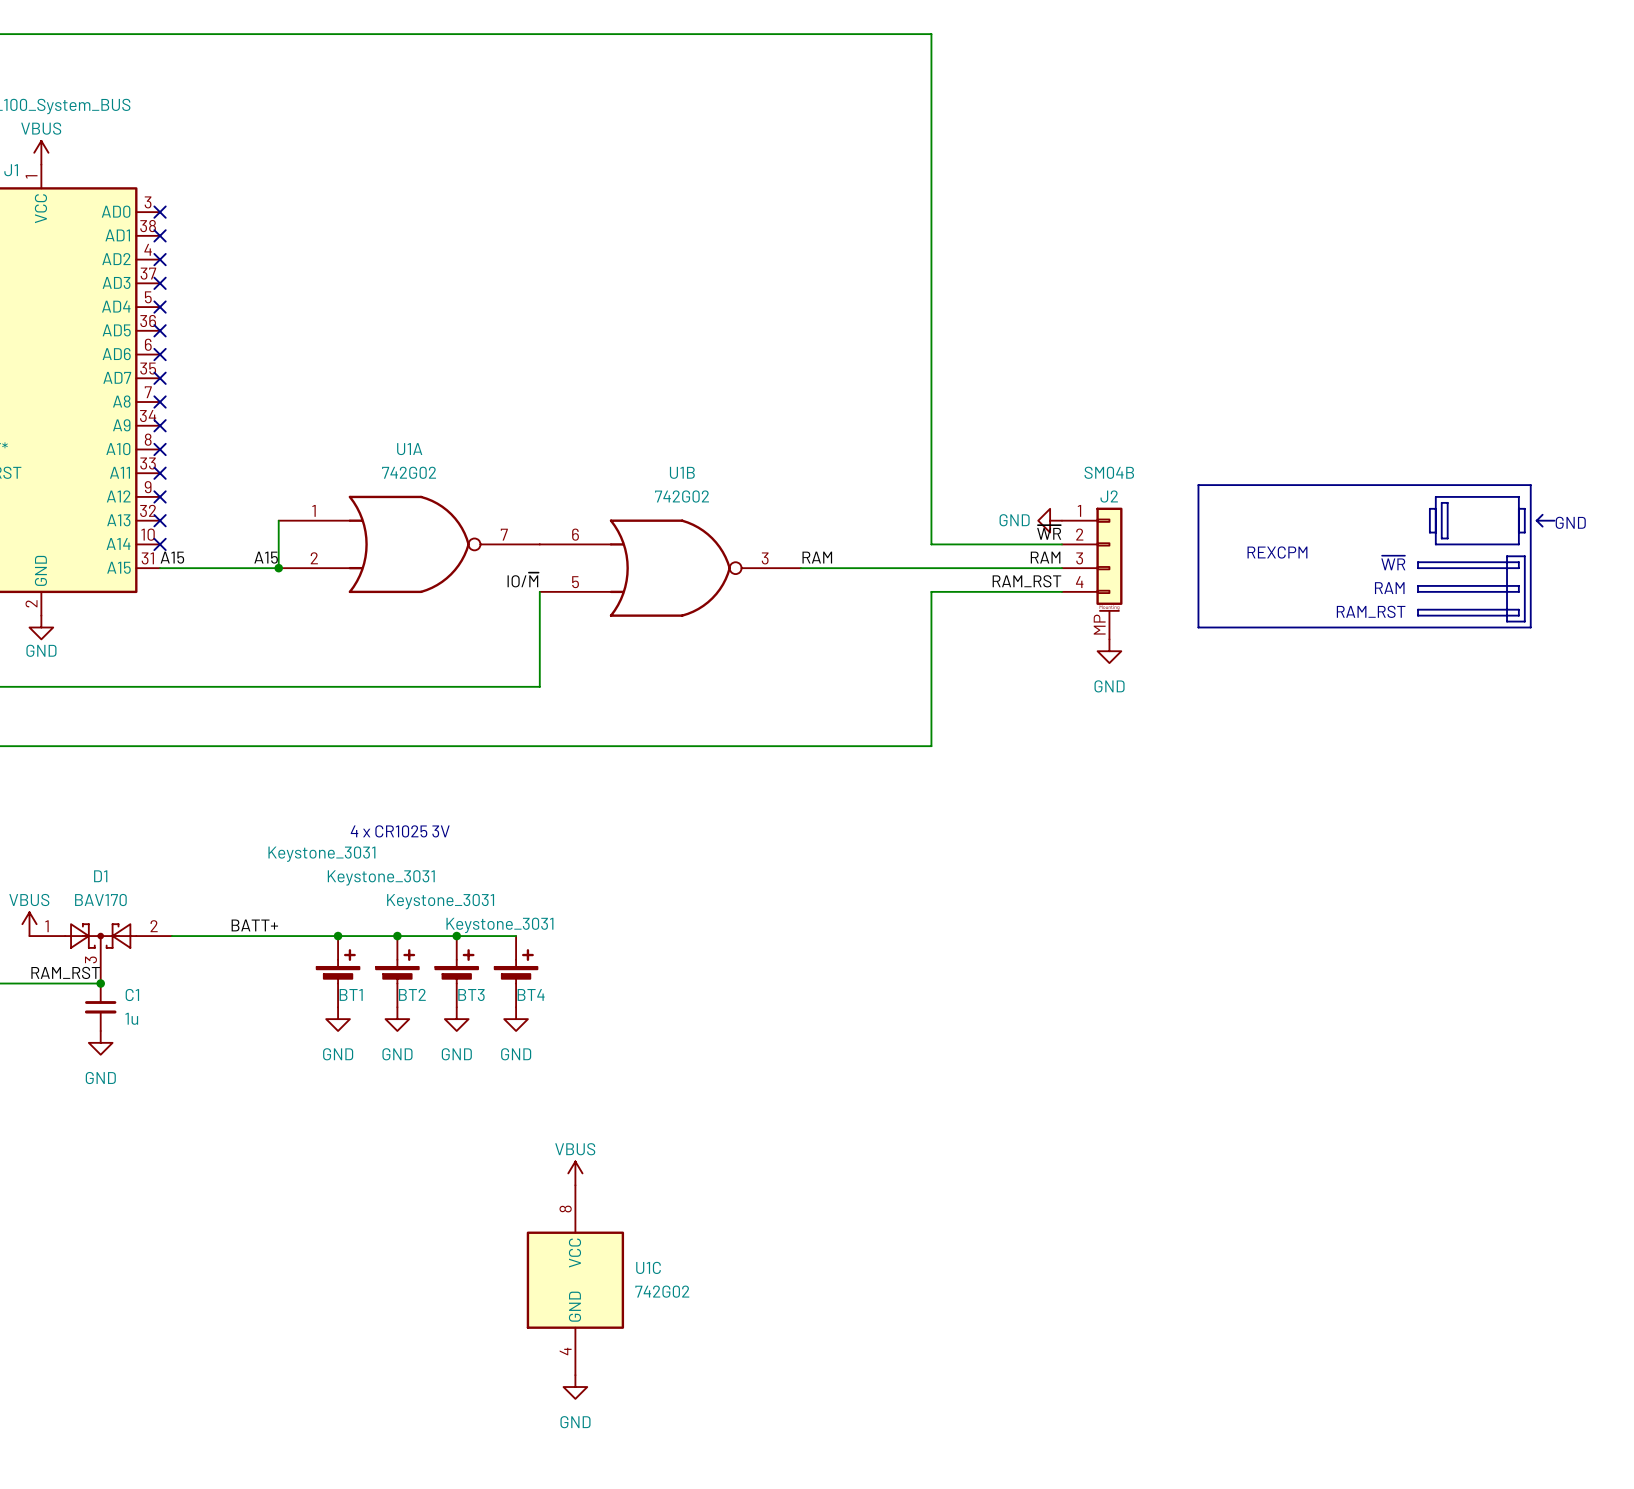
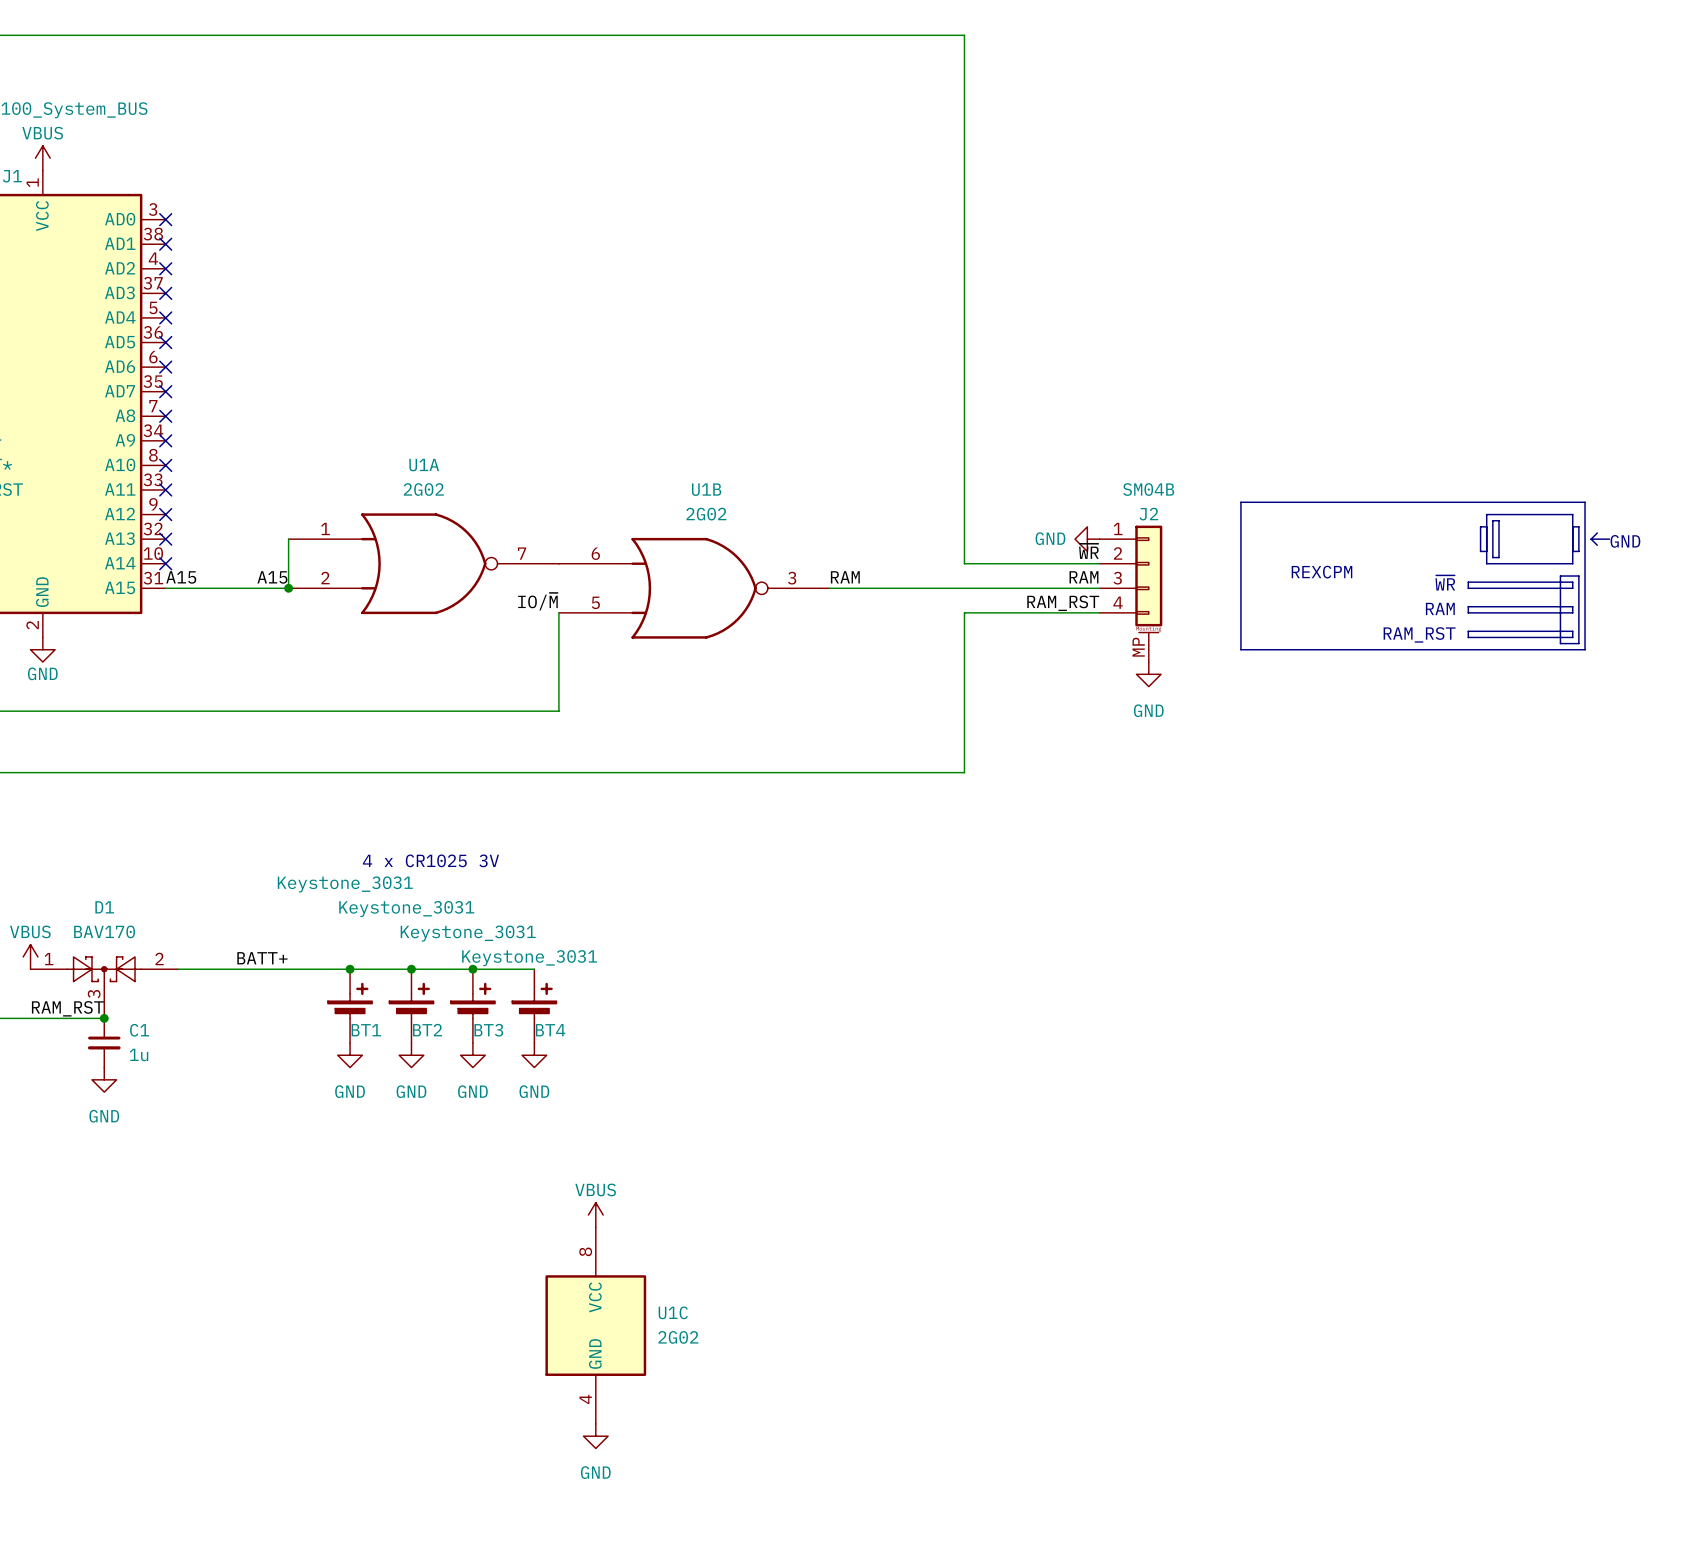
U1A value: 742G02 (409, 472) -> 2G02 (423, 489)
U1B value: 742G02 (682, 496) -> 2G02 (706, 514)
U1C value: 742G02 (662, 1291) -> 2G02 (678, 1337)

